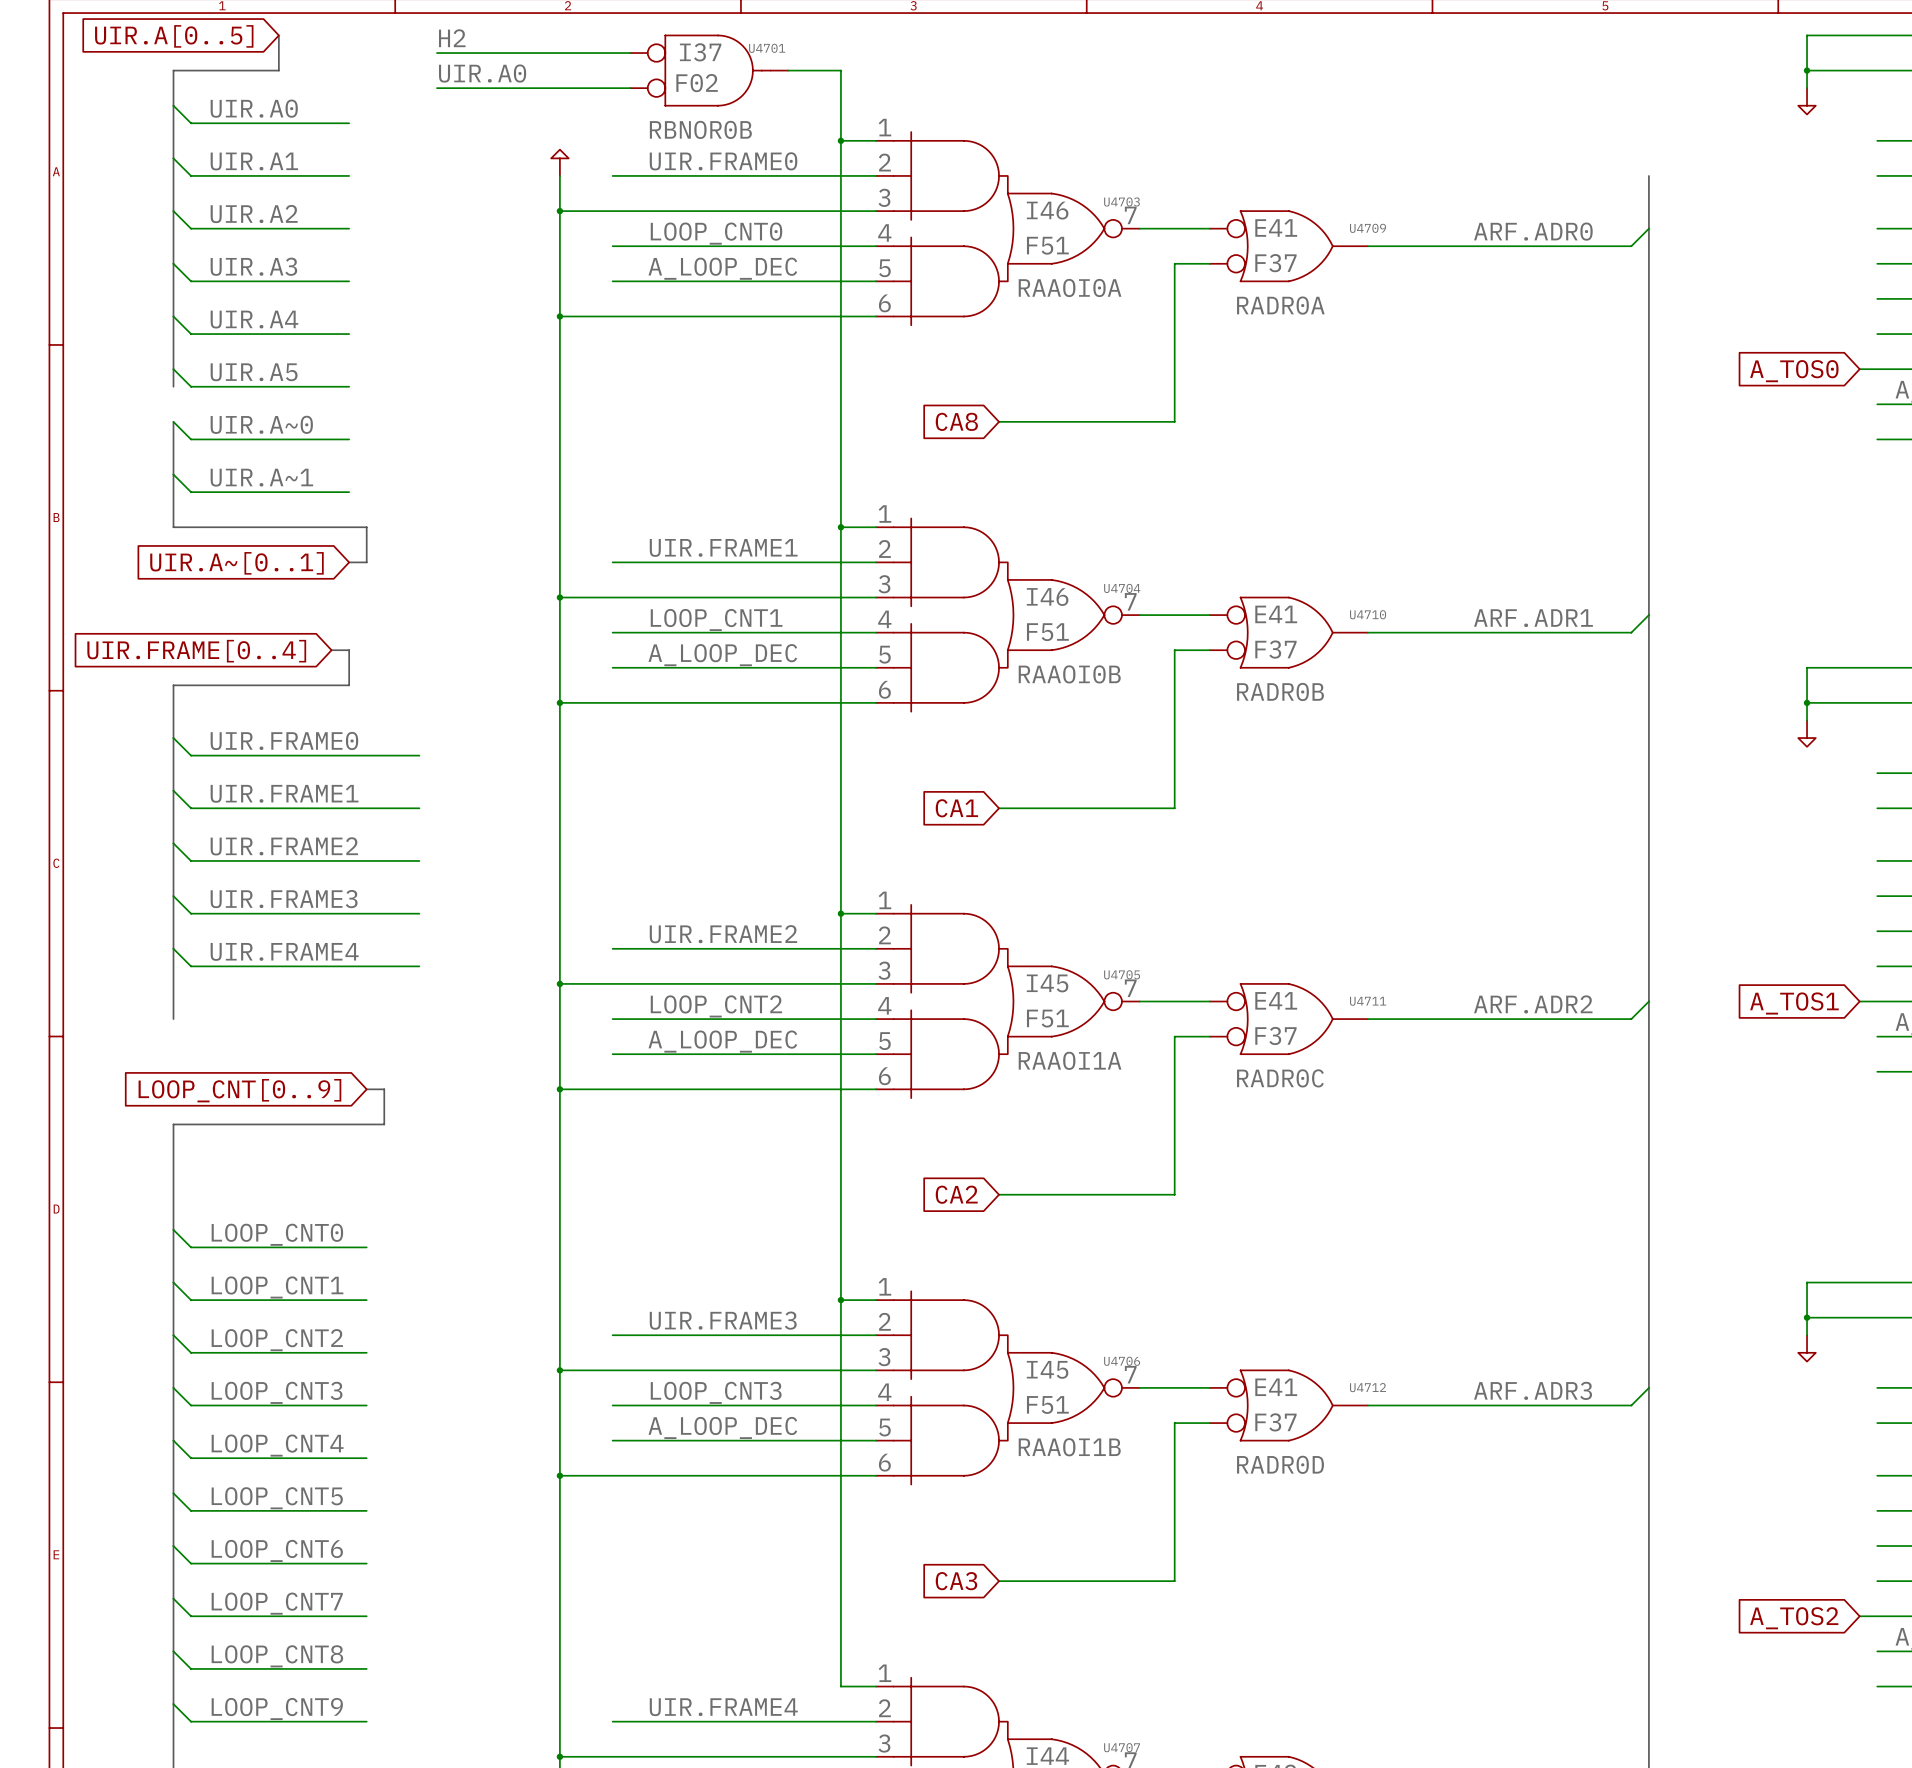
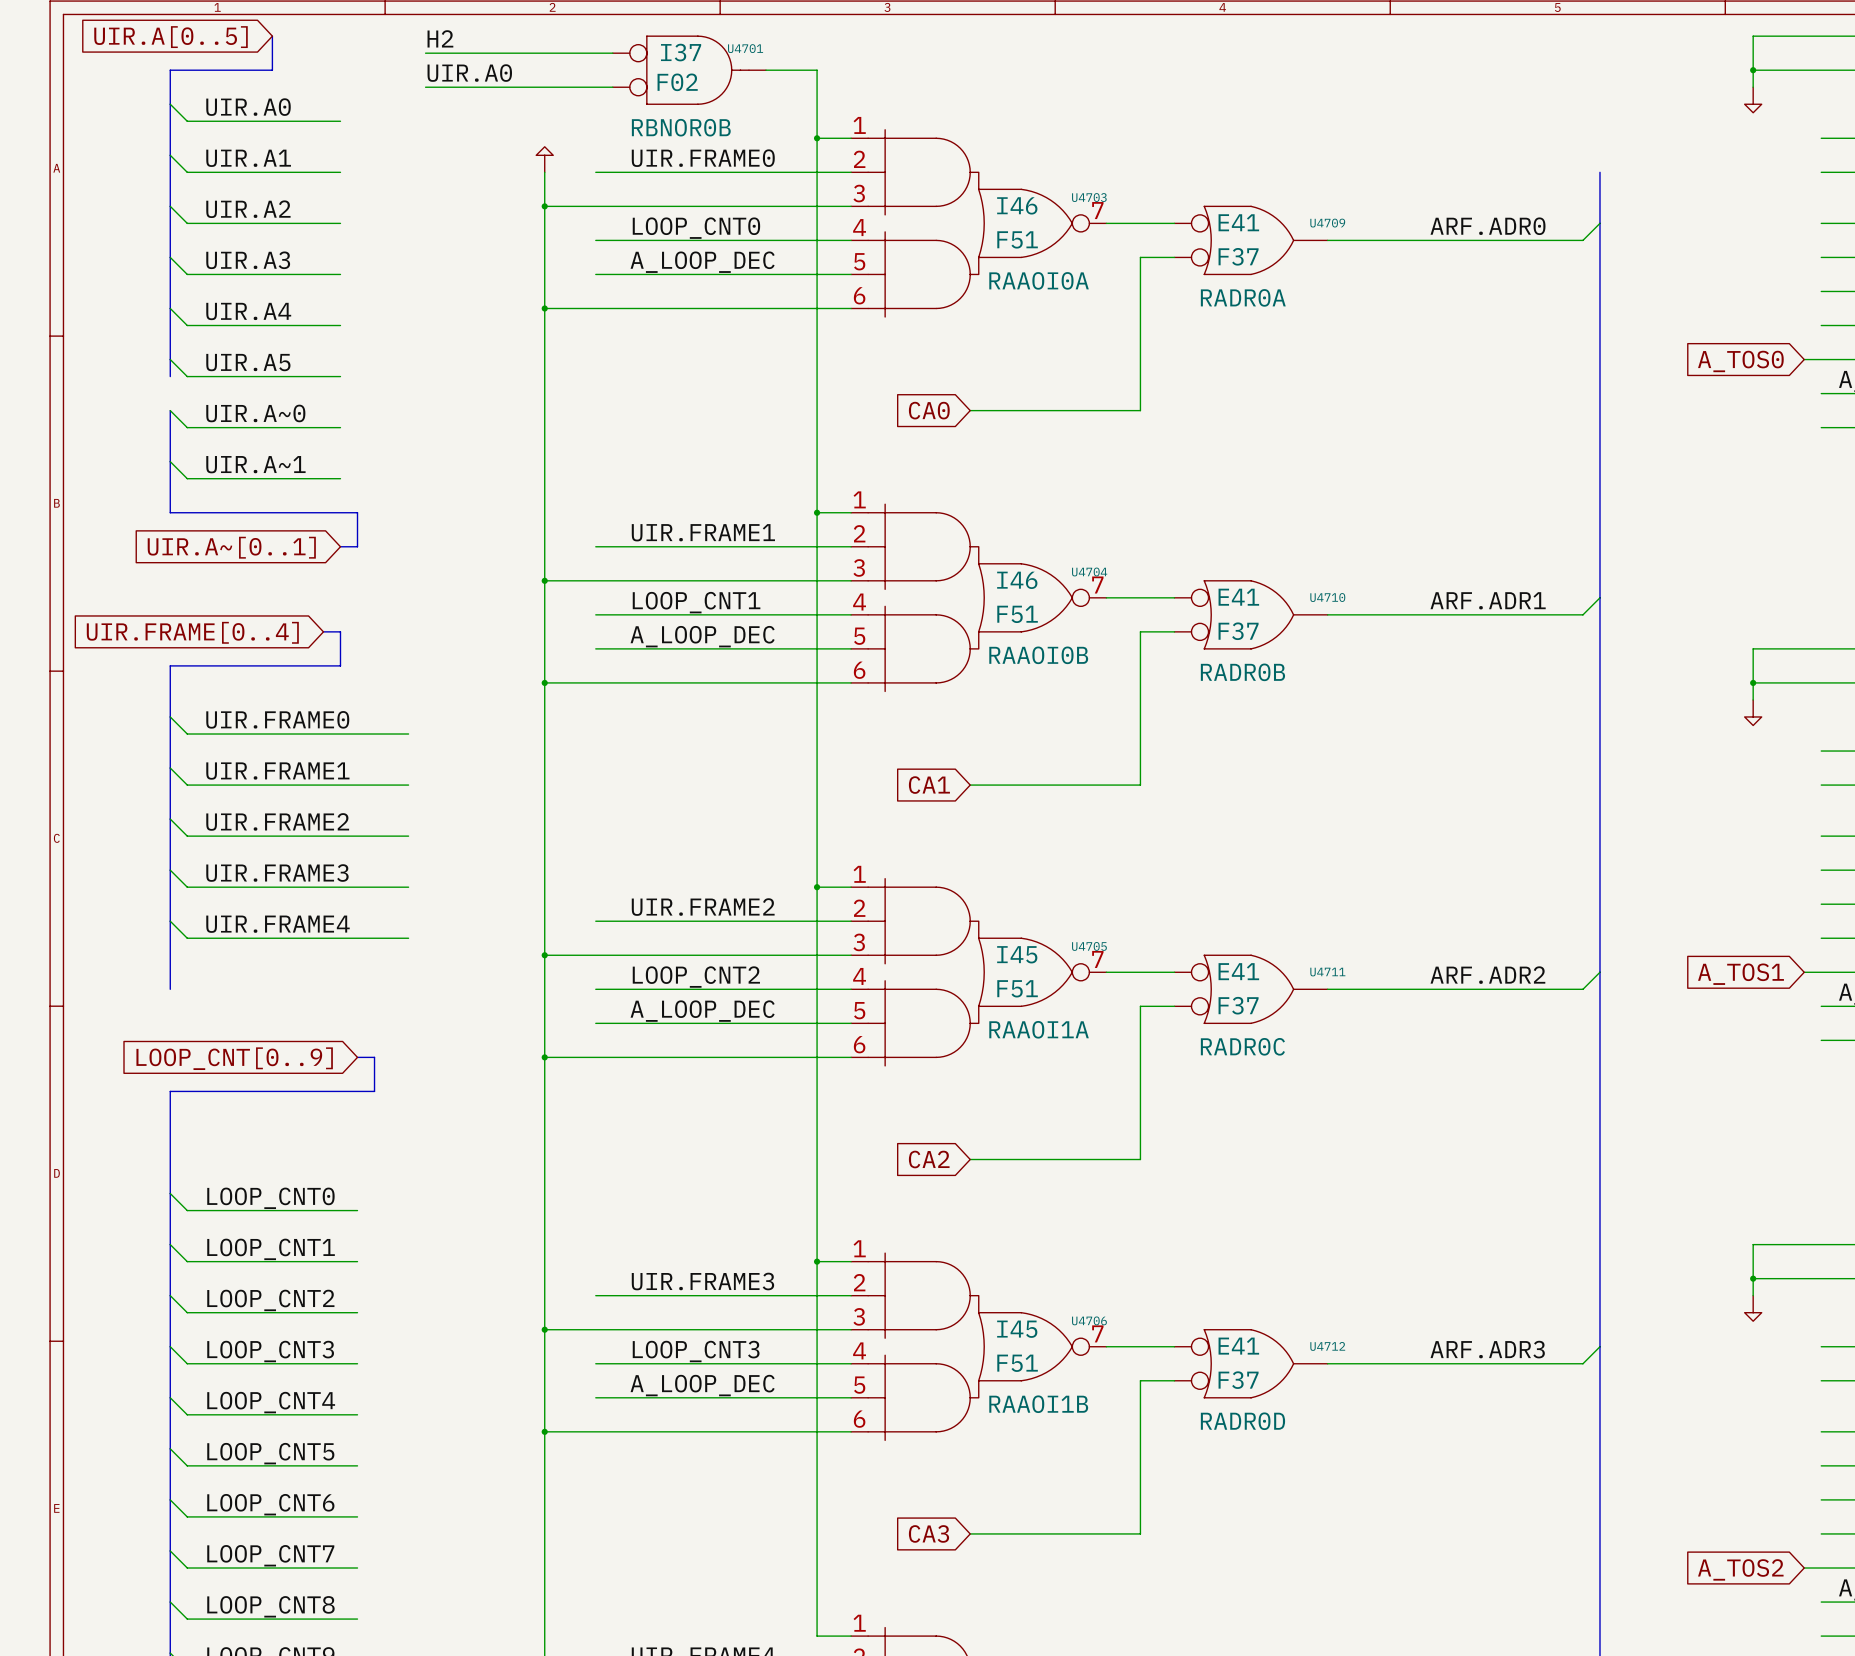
global label: CA8 (956, 421) -> CA0 (929, 410)

